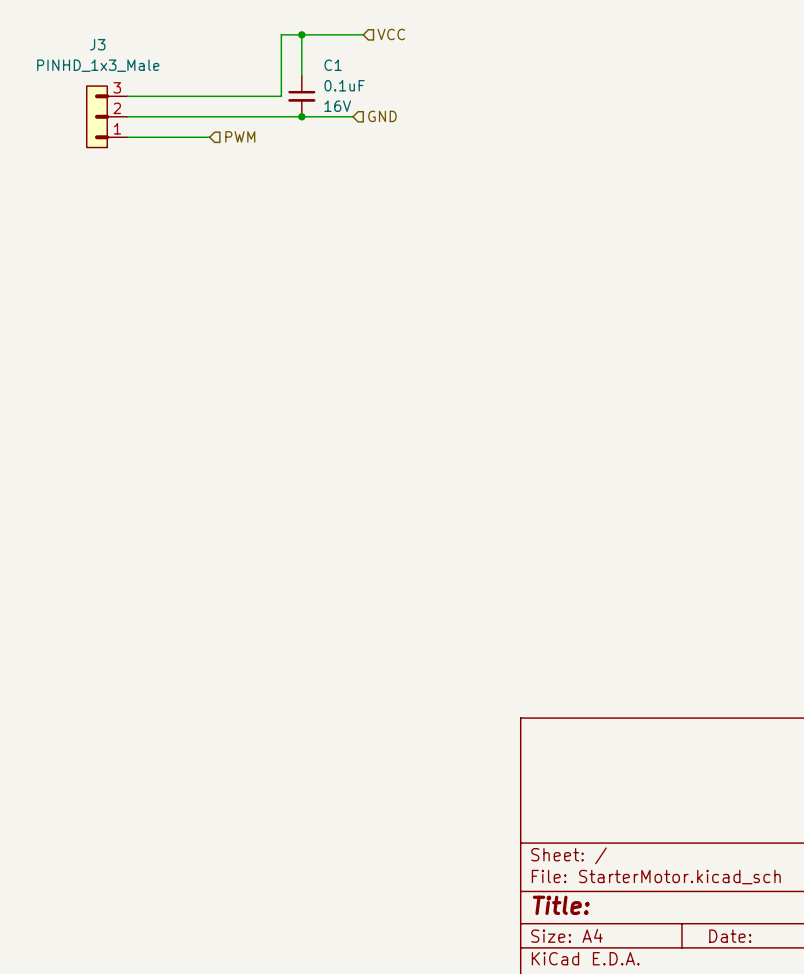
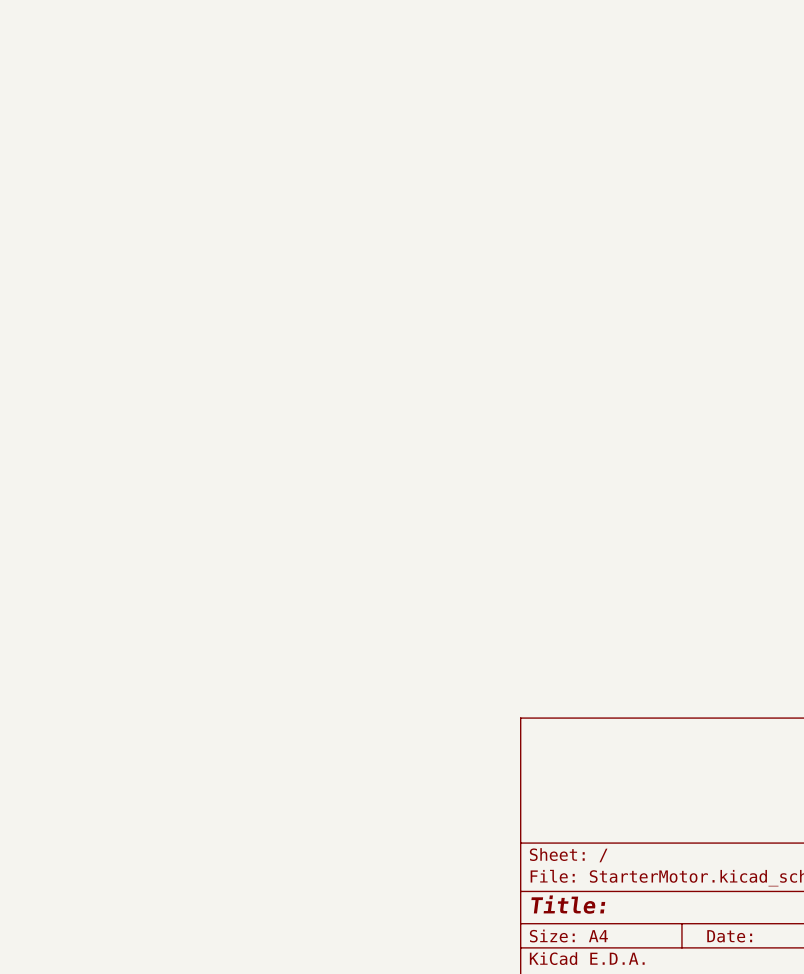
wire: (301, 34) (301, 75) -> none
junction: (301, 34) -> none
wire: (363, 34) (281, 34) (281, 96) (127, 96) -> none
hierarchical label: VCC (391, 34) -> none
C1: 0.1uF (301, 96) -> none
J3: PINHD_1x3_Male (107, 116) -> none
wire: (127, 116) (353, 116) -> none
junction: (301, 116) -> none
hierarchical label: GND (382, 116) -> none
hierarchical label: PWM (240, 136) -> none
wire: (127, 137) (209, 137) -> none

